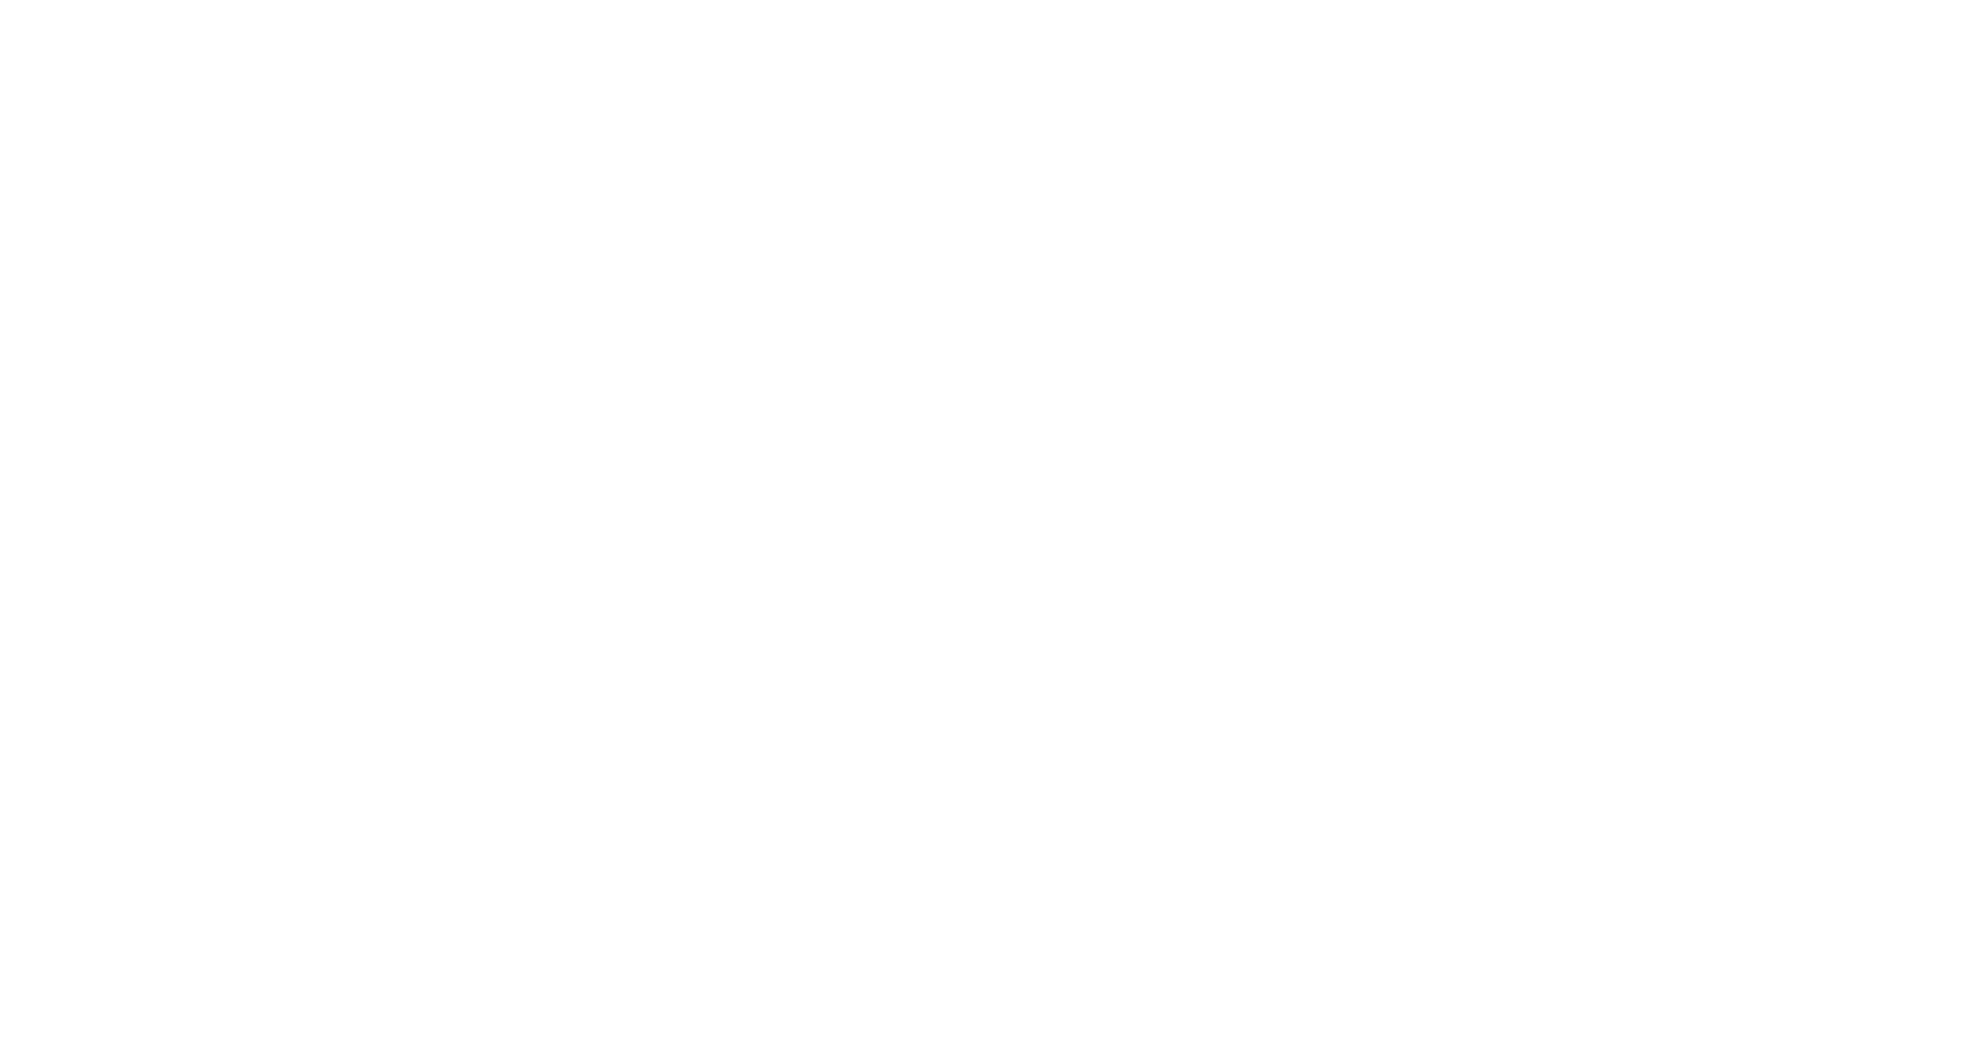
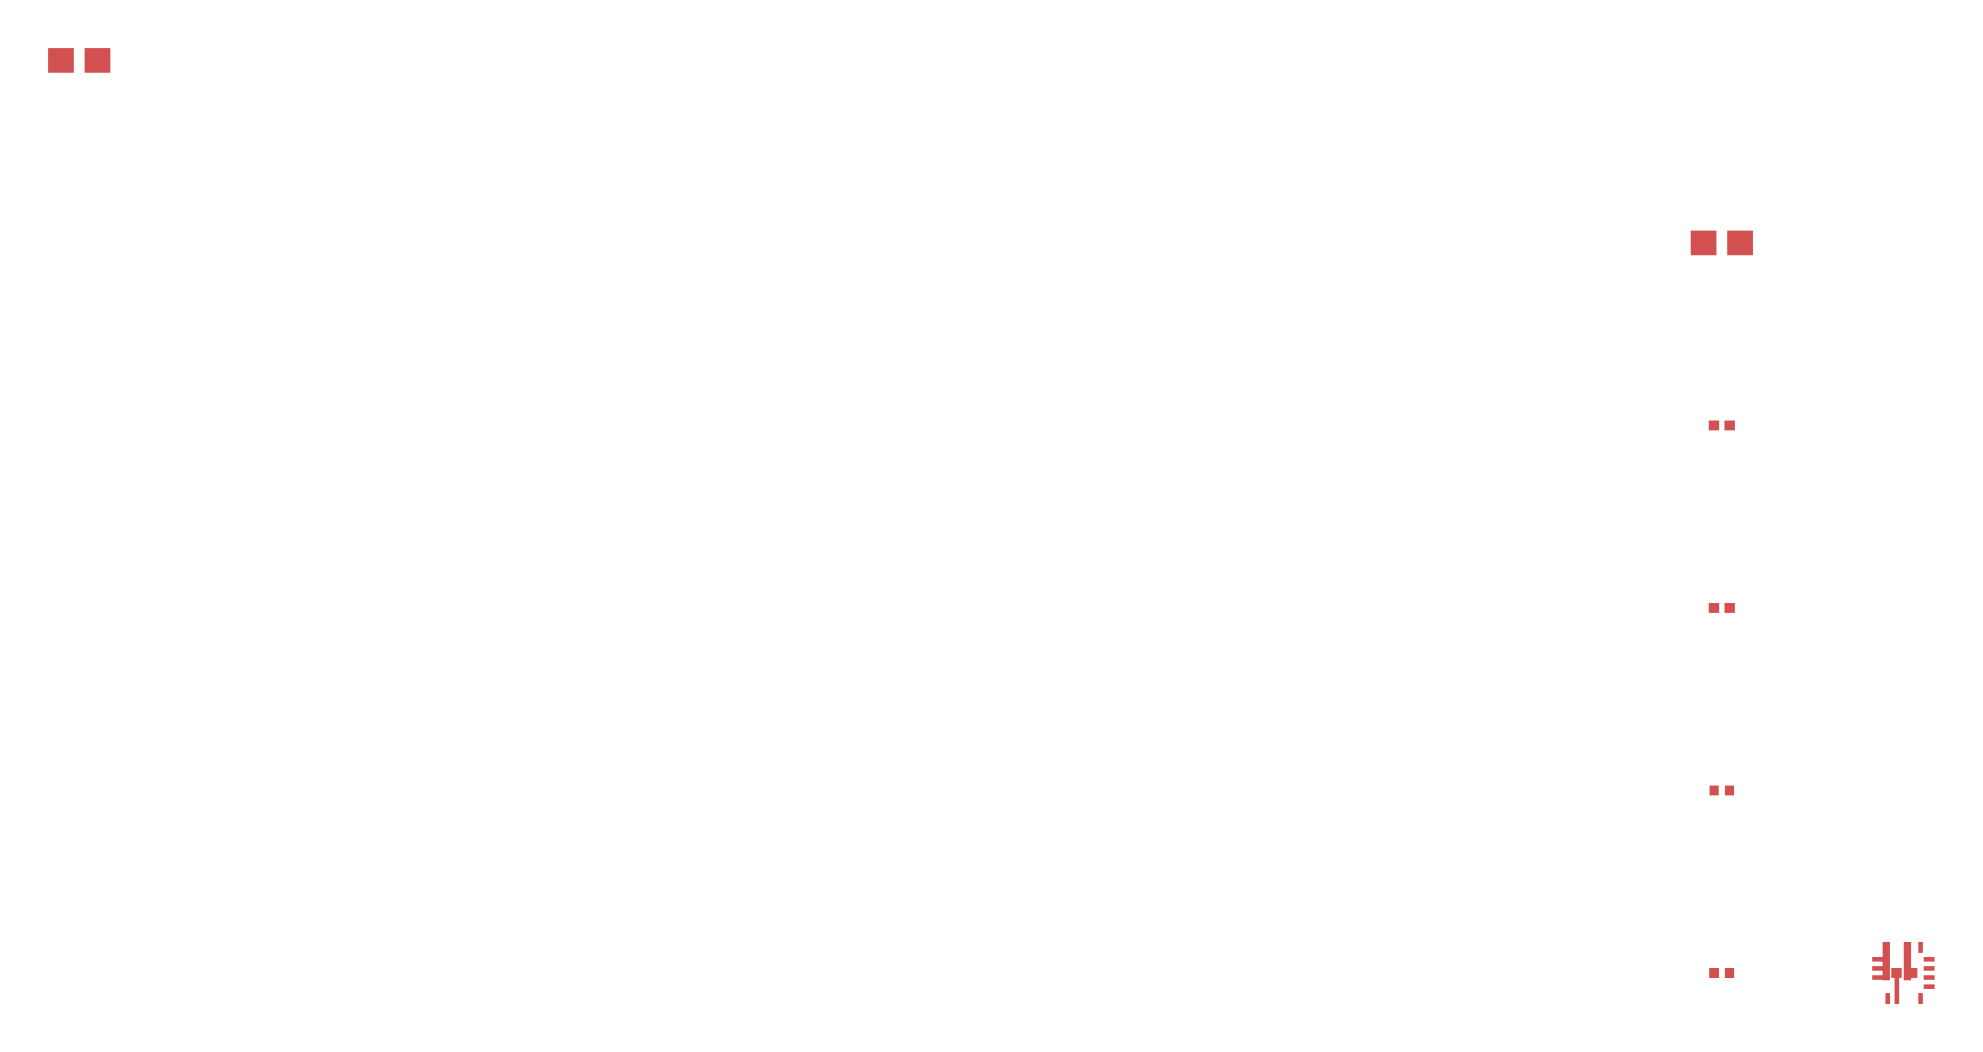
part: none -> (79, 60)
part: none -> (1721, 242)
part: none -> (1721, 425)
part: none -> (1721, 607)
part: none -> (1721, 790)
part: none -> (1721, 972)
part: none -> (1903, 972)
part: none -> (1904, 972)

